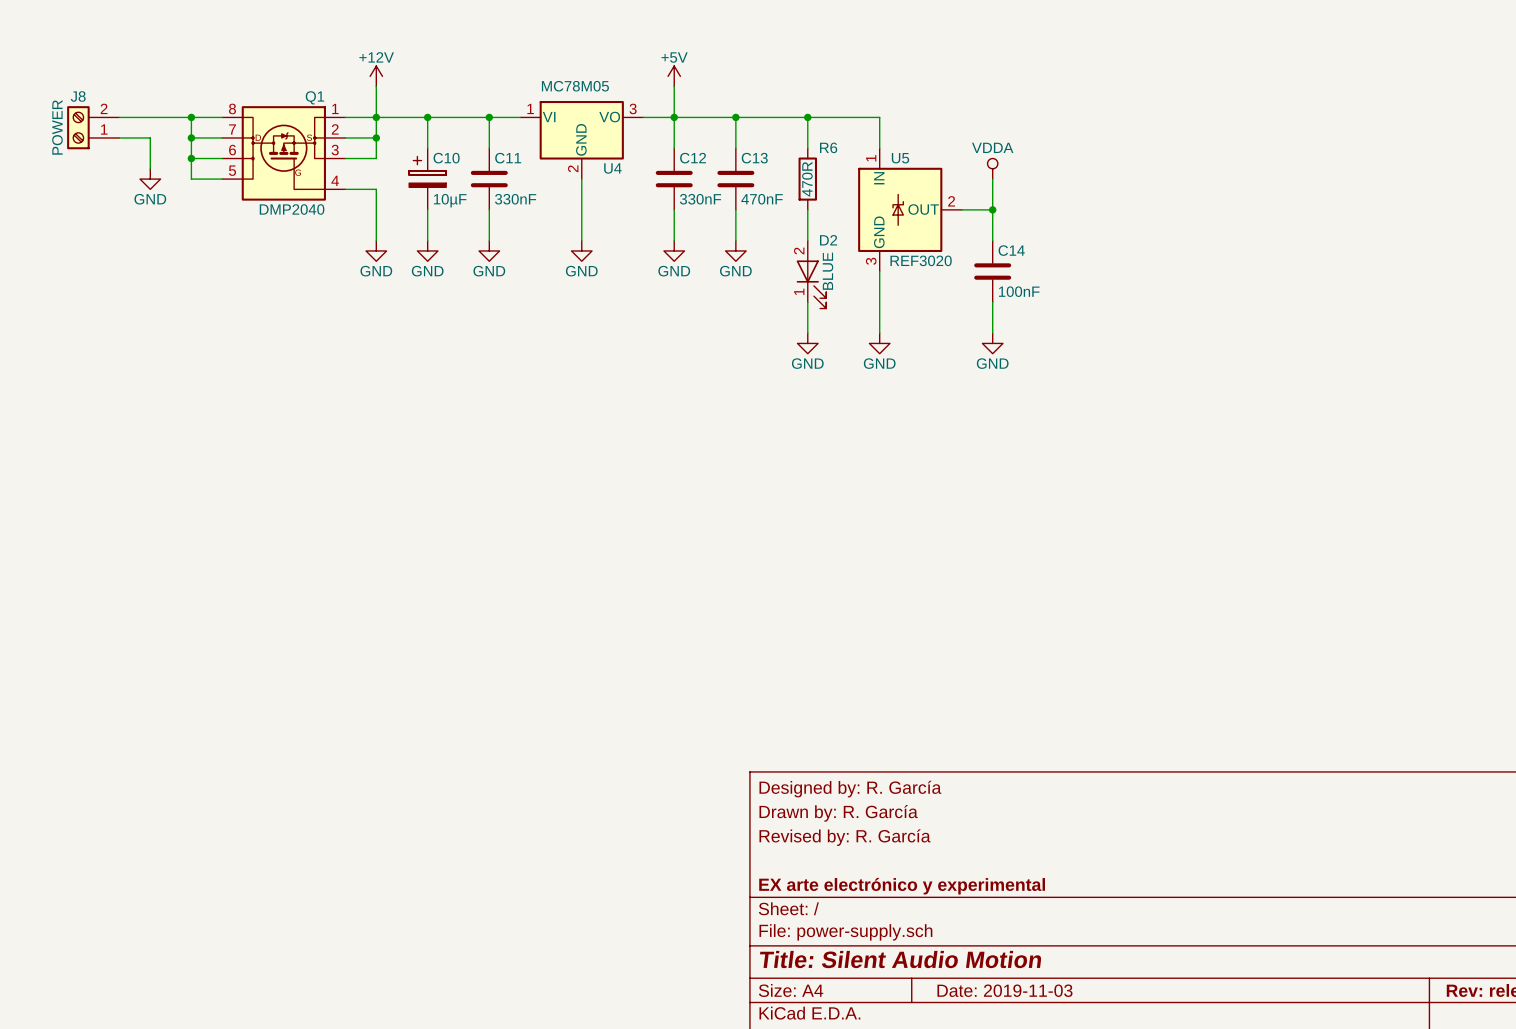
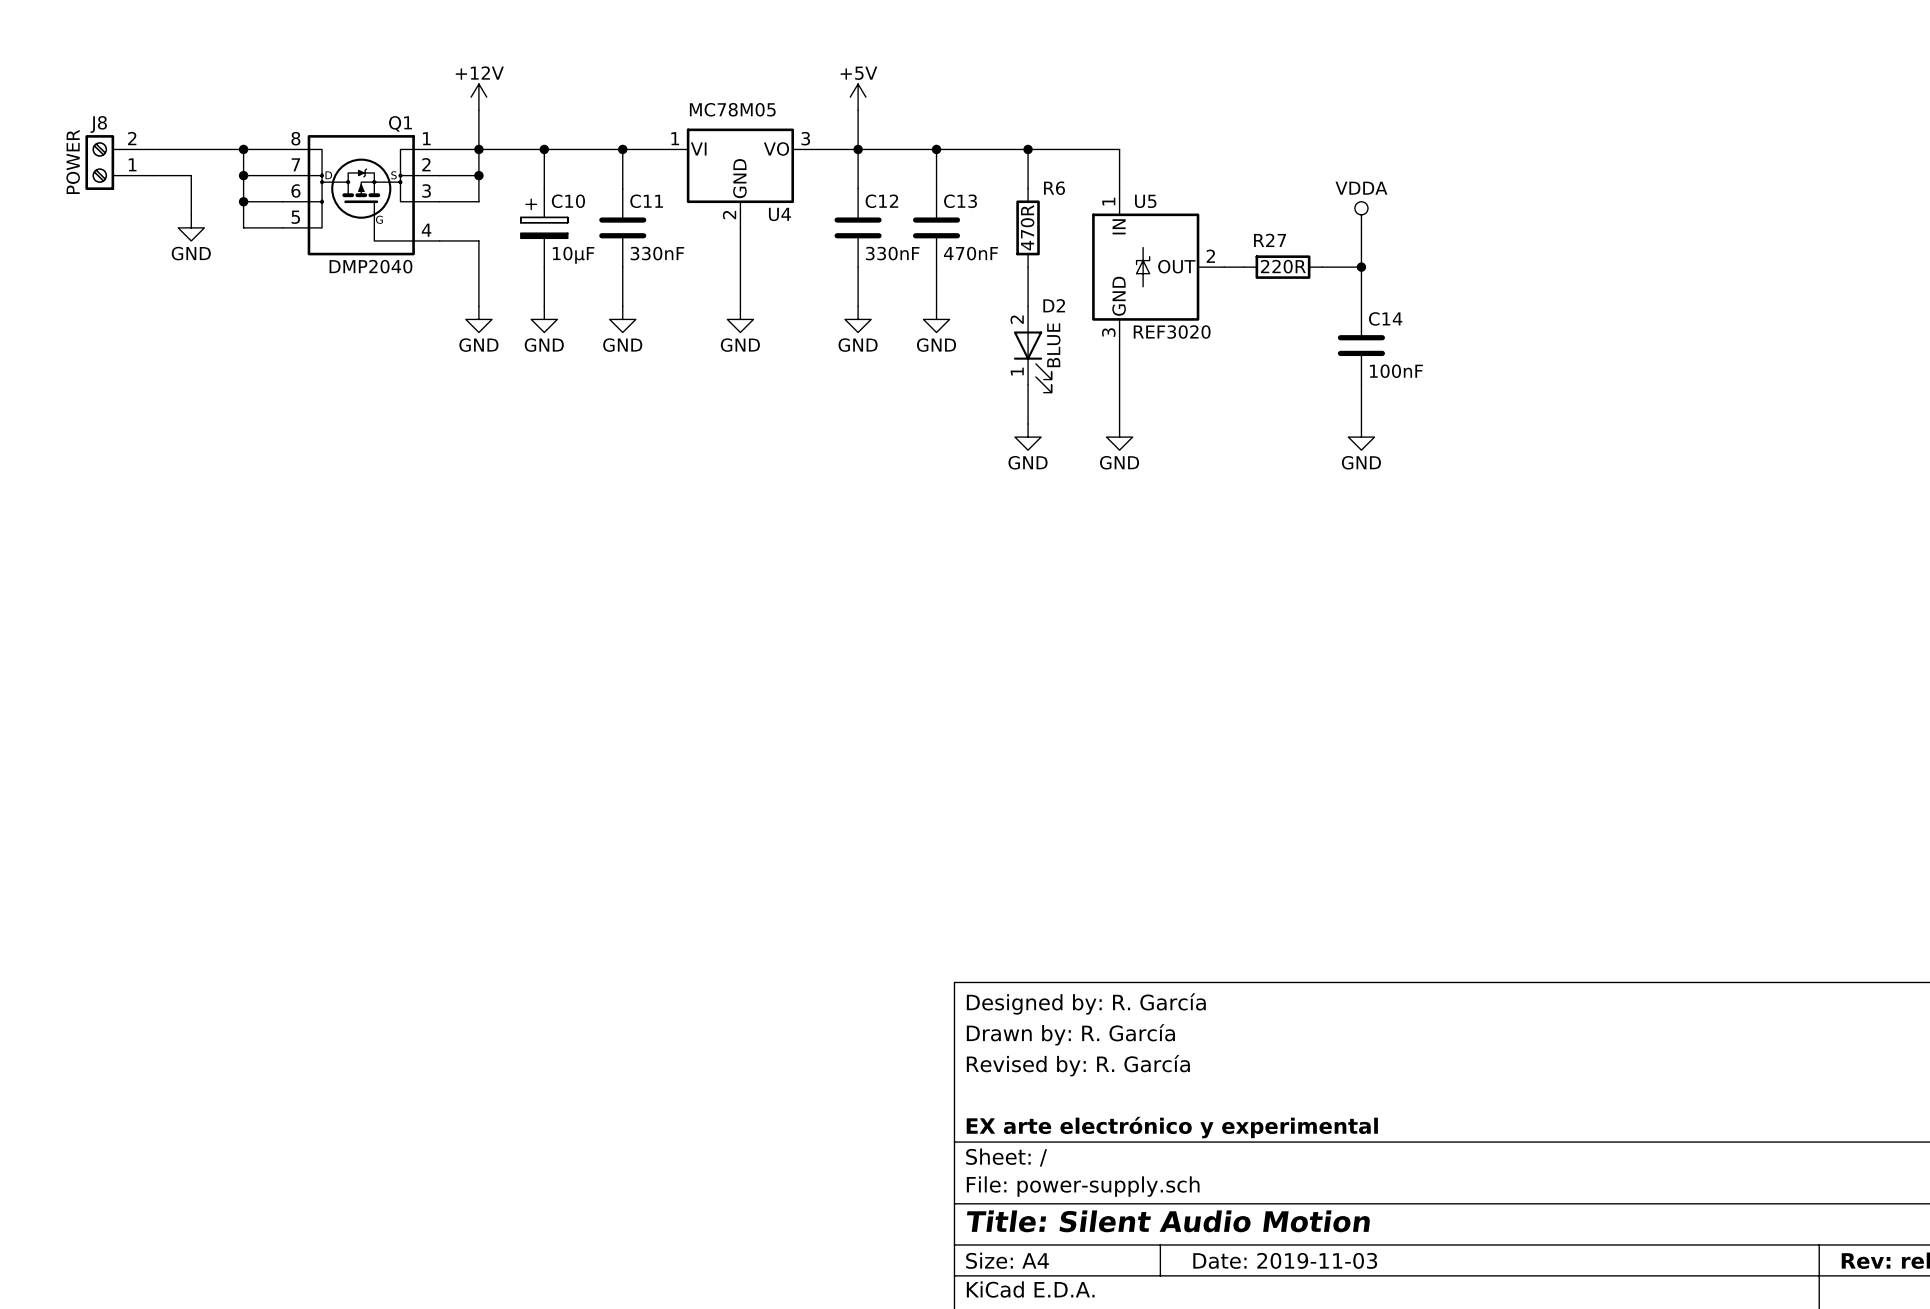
power symbol position: VDDA (992, 168) -> VDDA (1361, 214)
wire: (992, 179) (992, 240) -> (1361, 227) (1361, 306)
junction: (992, 209) -> none
R27: none -> 220R (1283, 267)
wire: none -> (1322, 267) (1361, 267)
junction: none -> (1361, 267)
C14 position: (992, 271) -> (1361, 345)
wire: (992, 302) (992, 333) -> (1361, 384) (1361, 424)
power symbol position: GND (992, 343) -> GND (1361, 437)

